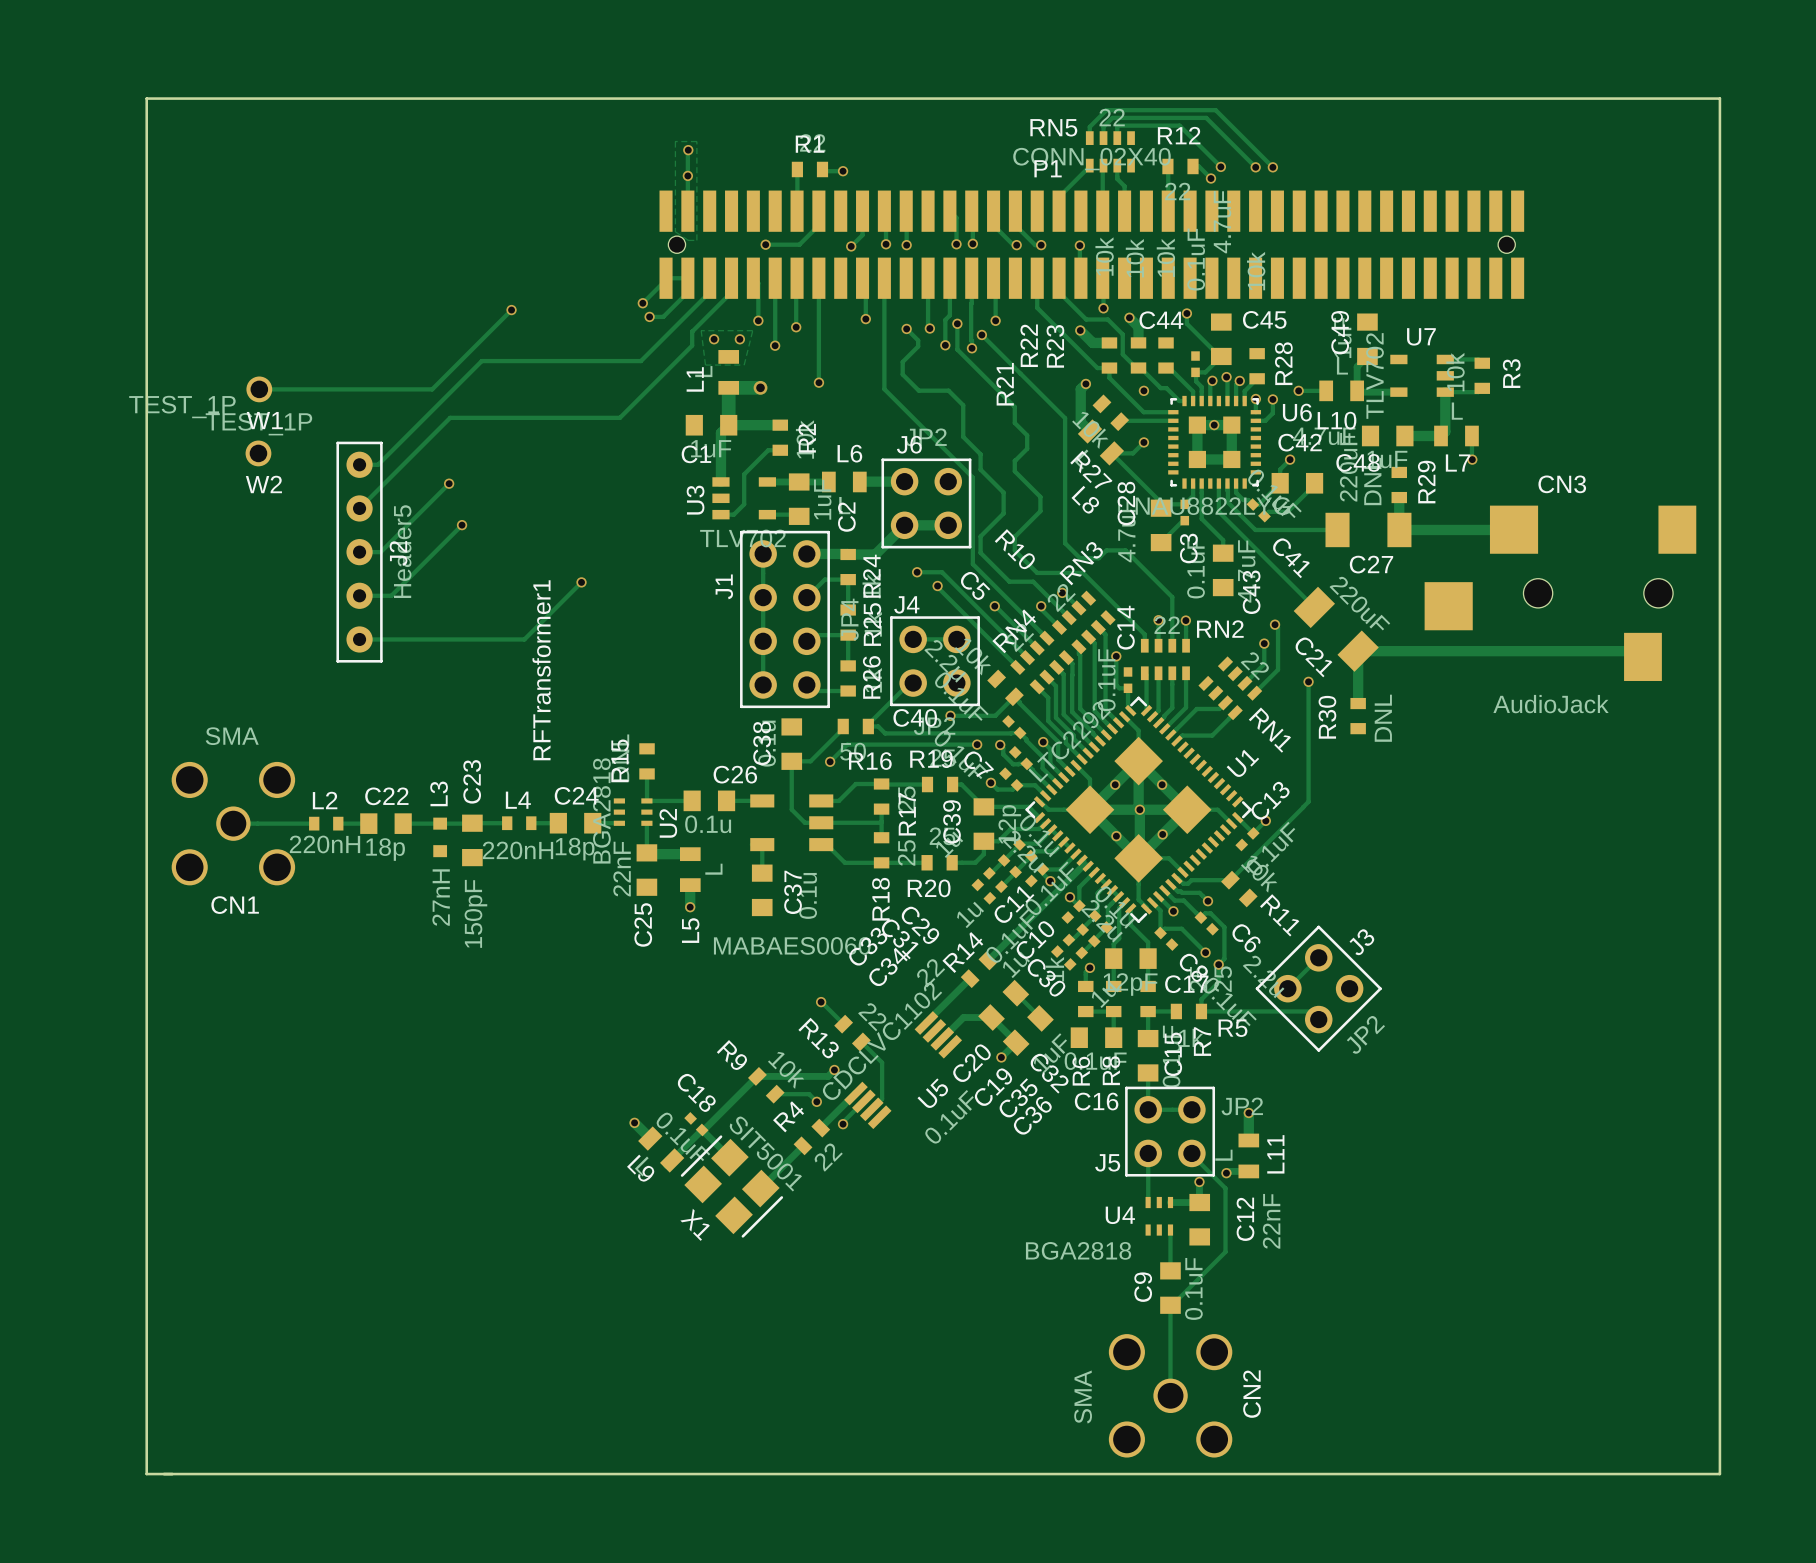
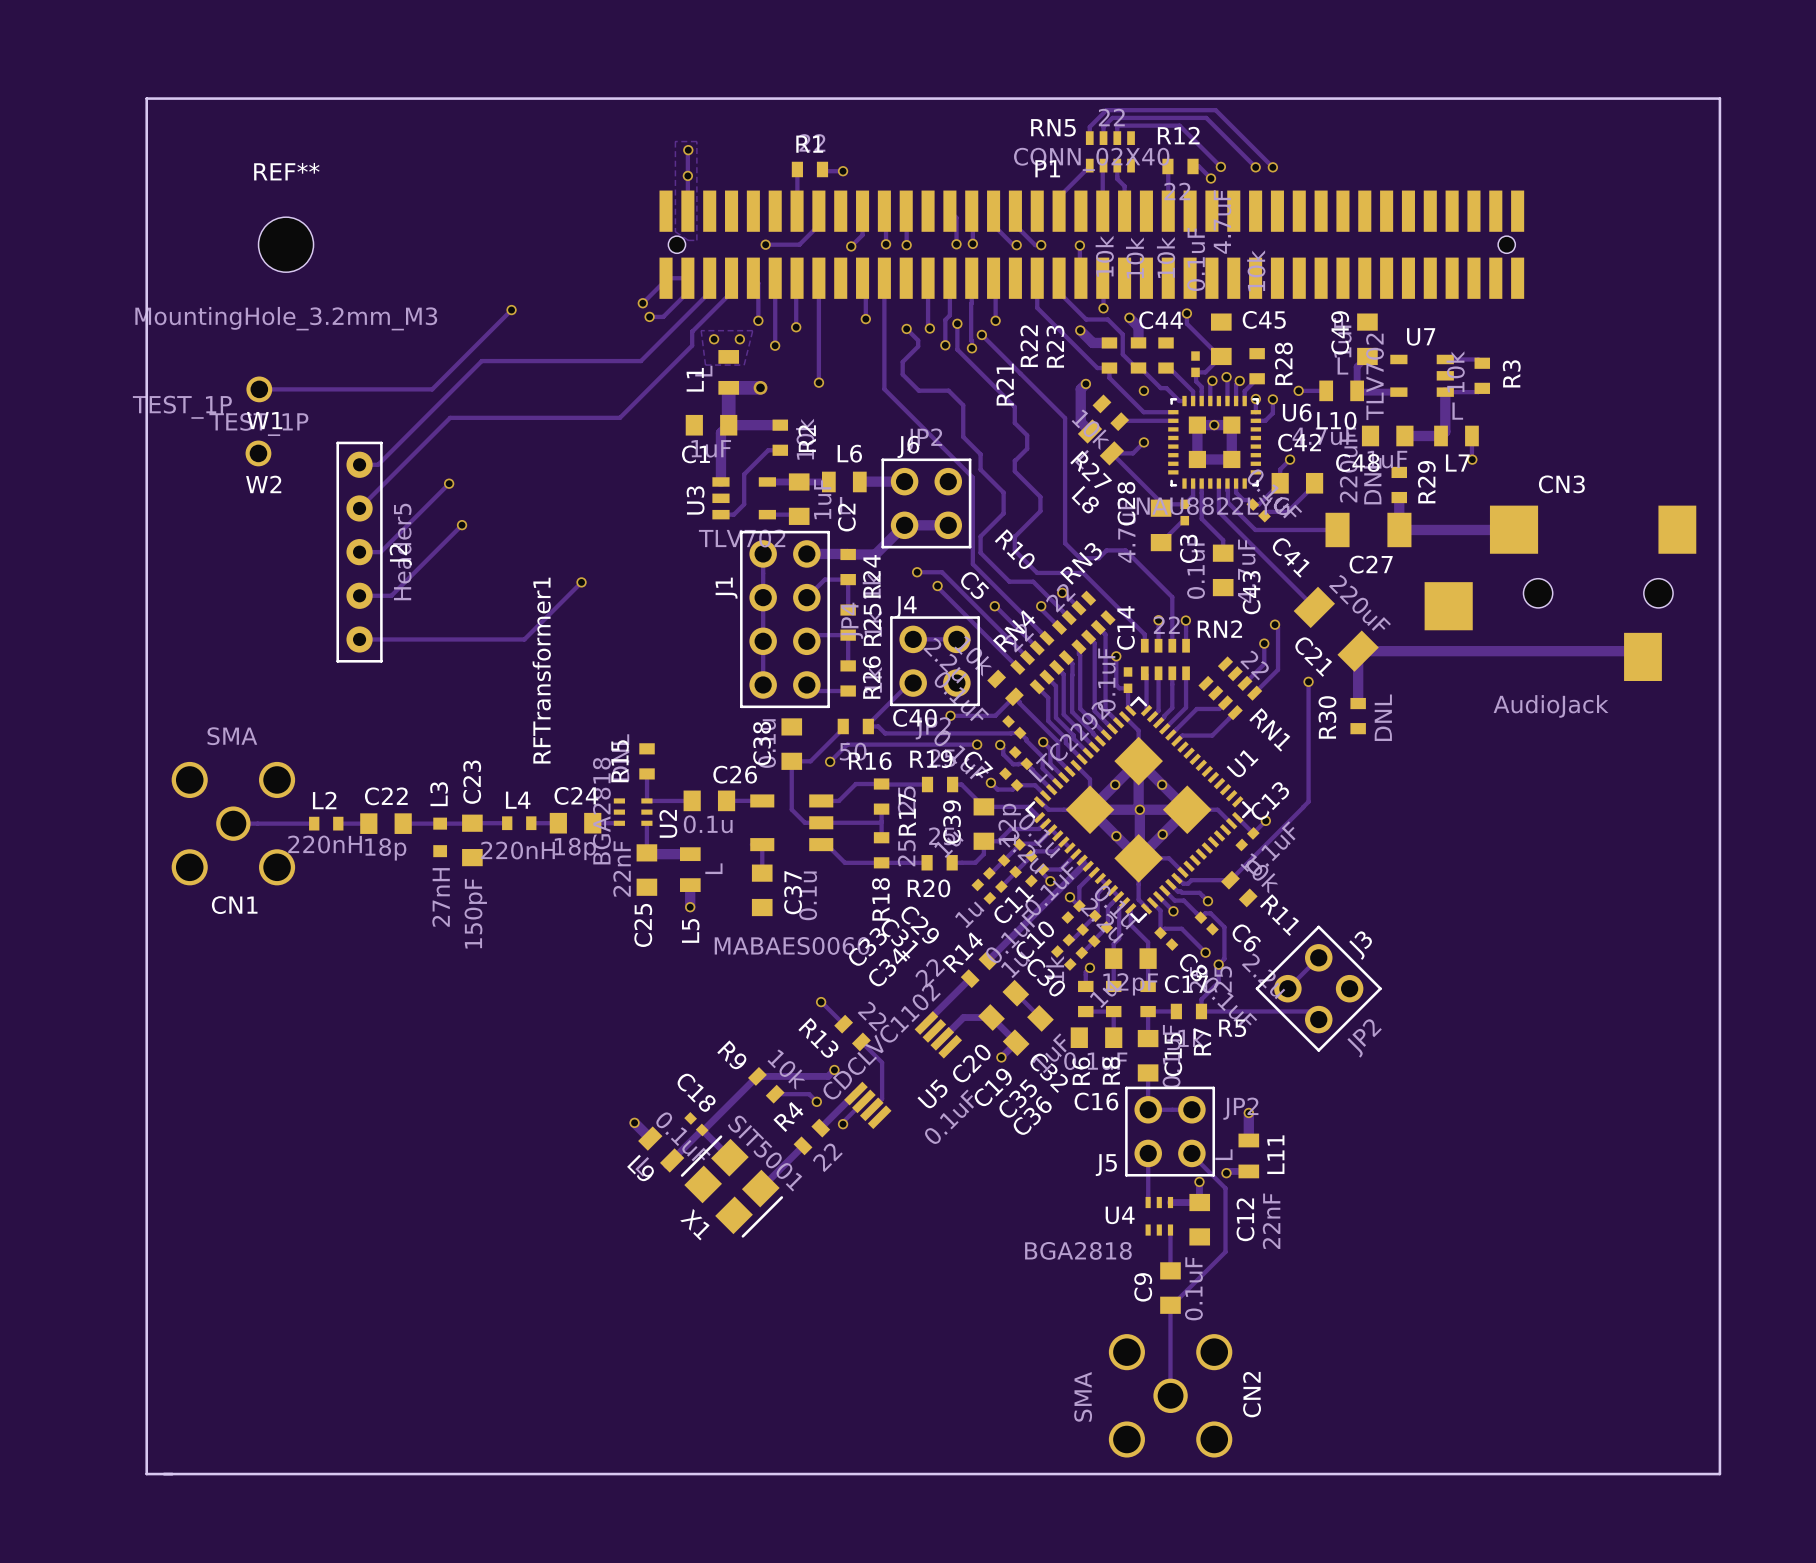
REF**: none -> MountingHole_3.2mm_M3 (286, 244)

